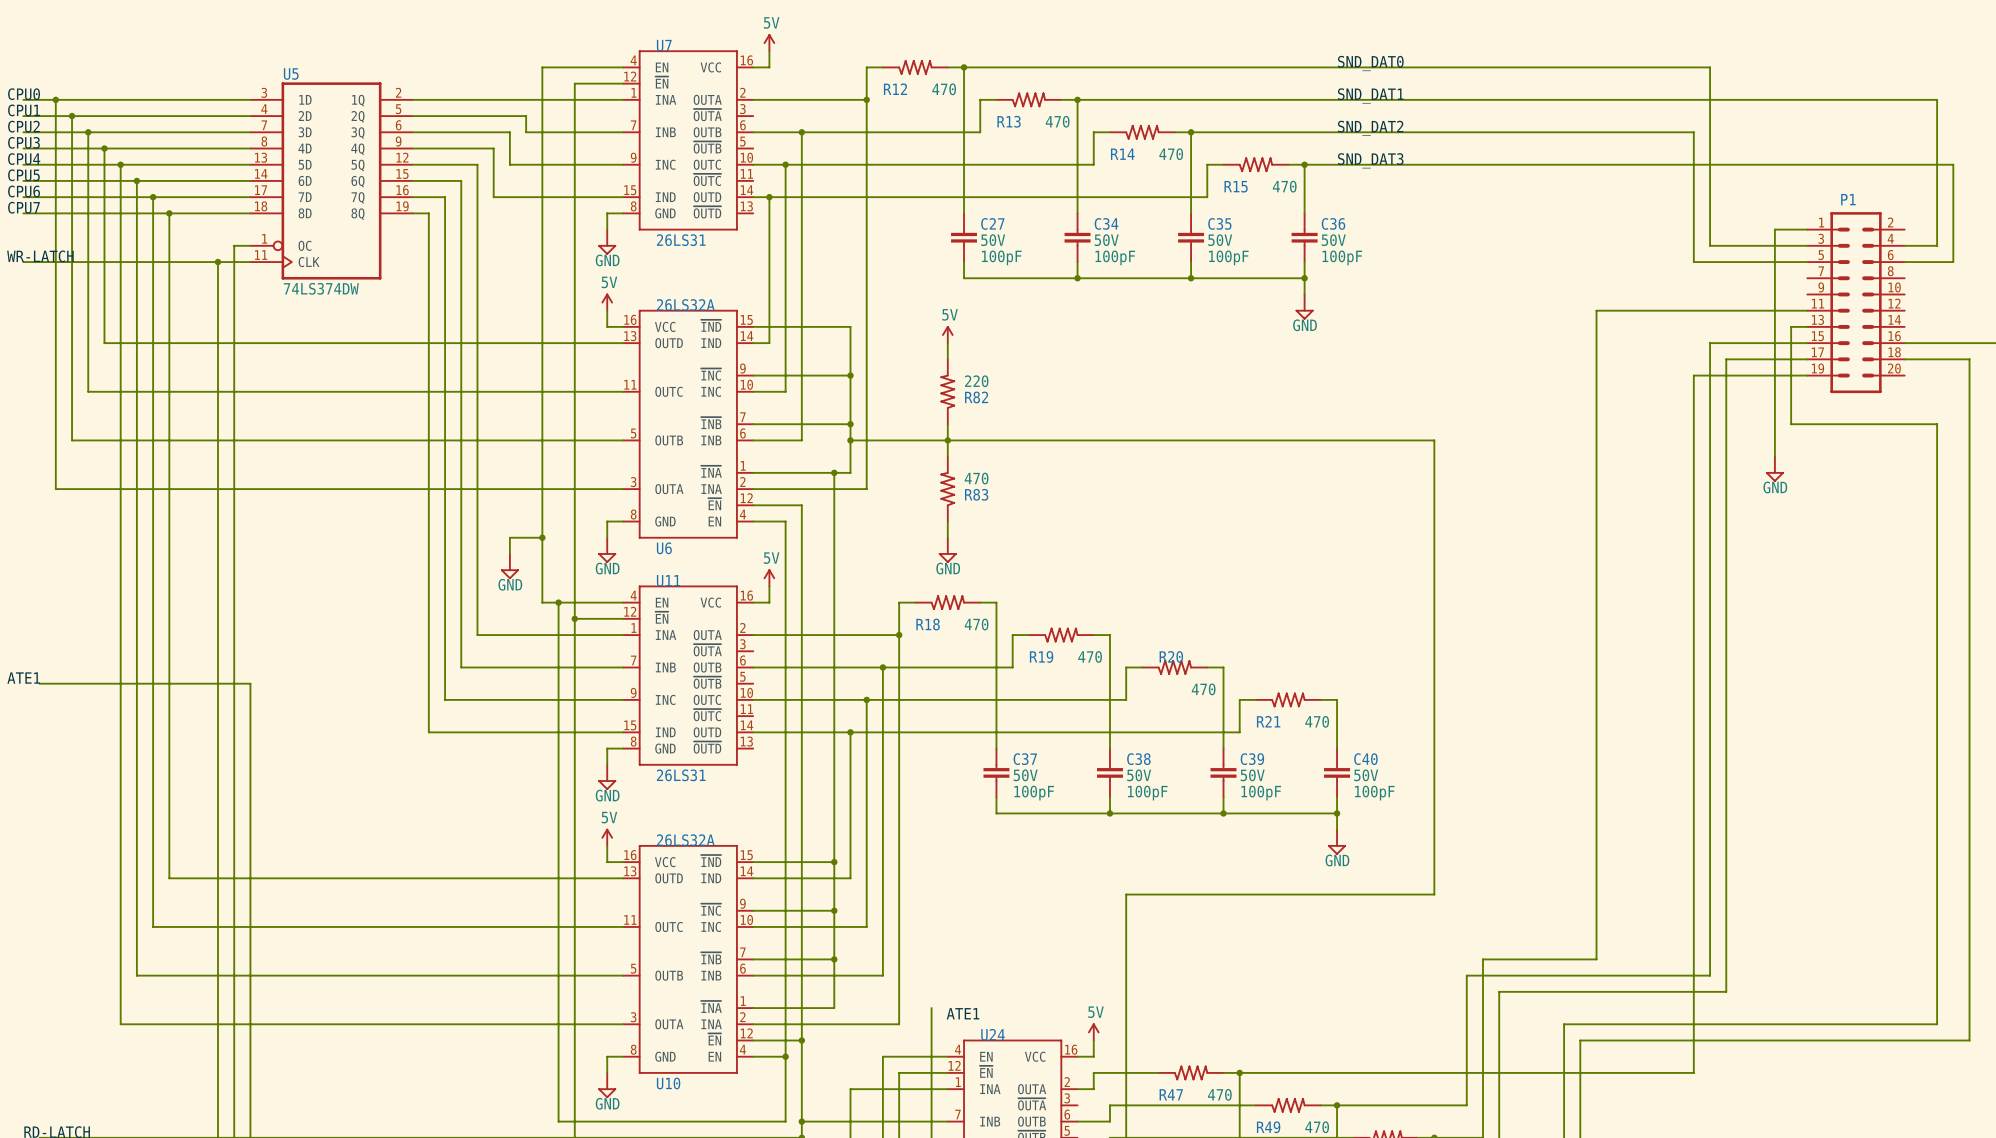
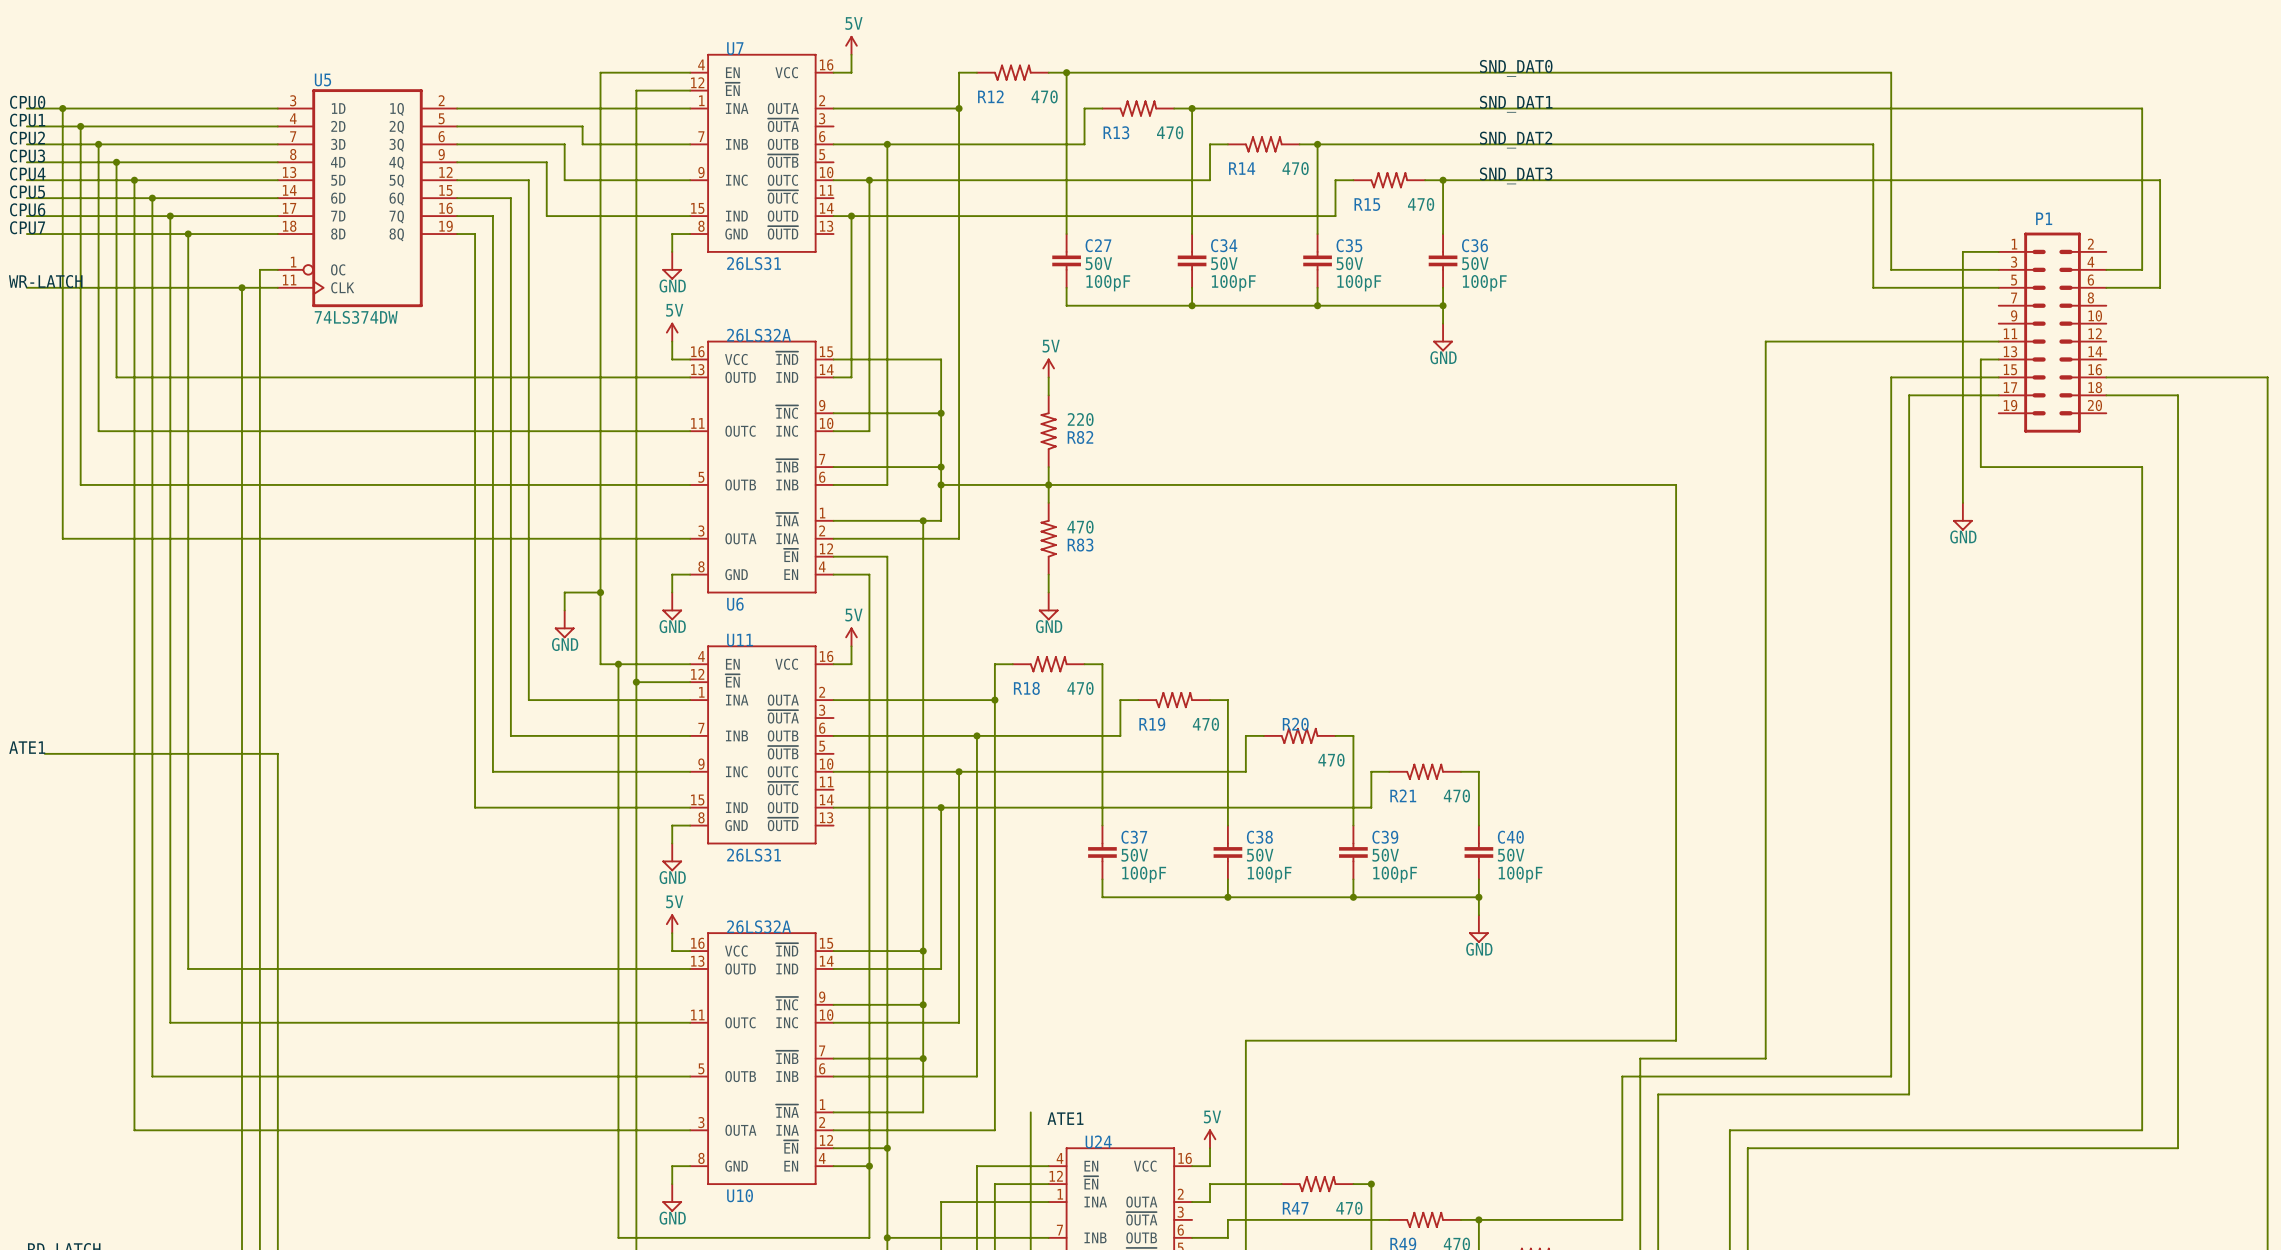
wire: (1807, 375) (1693, 375) (1693, 1072) (1239, 1072) -> none
wire: (1434, 440) (1434, 894) (1126, 894) (1126, 943) -> (1586, 484) (1676, 484) (1676, 1040) (1245, 1040)

